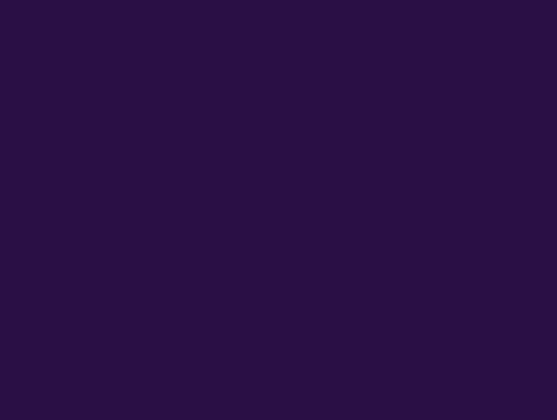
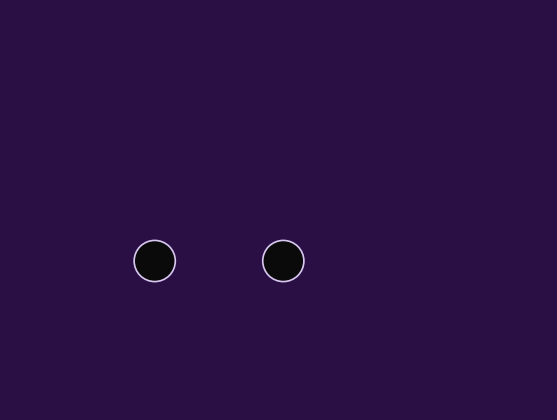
part: none -> (219, 261)

